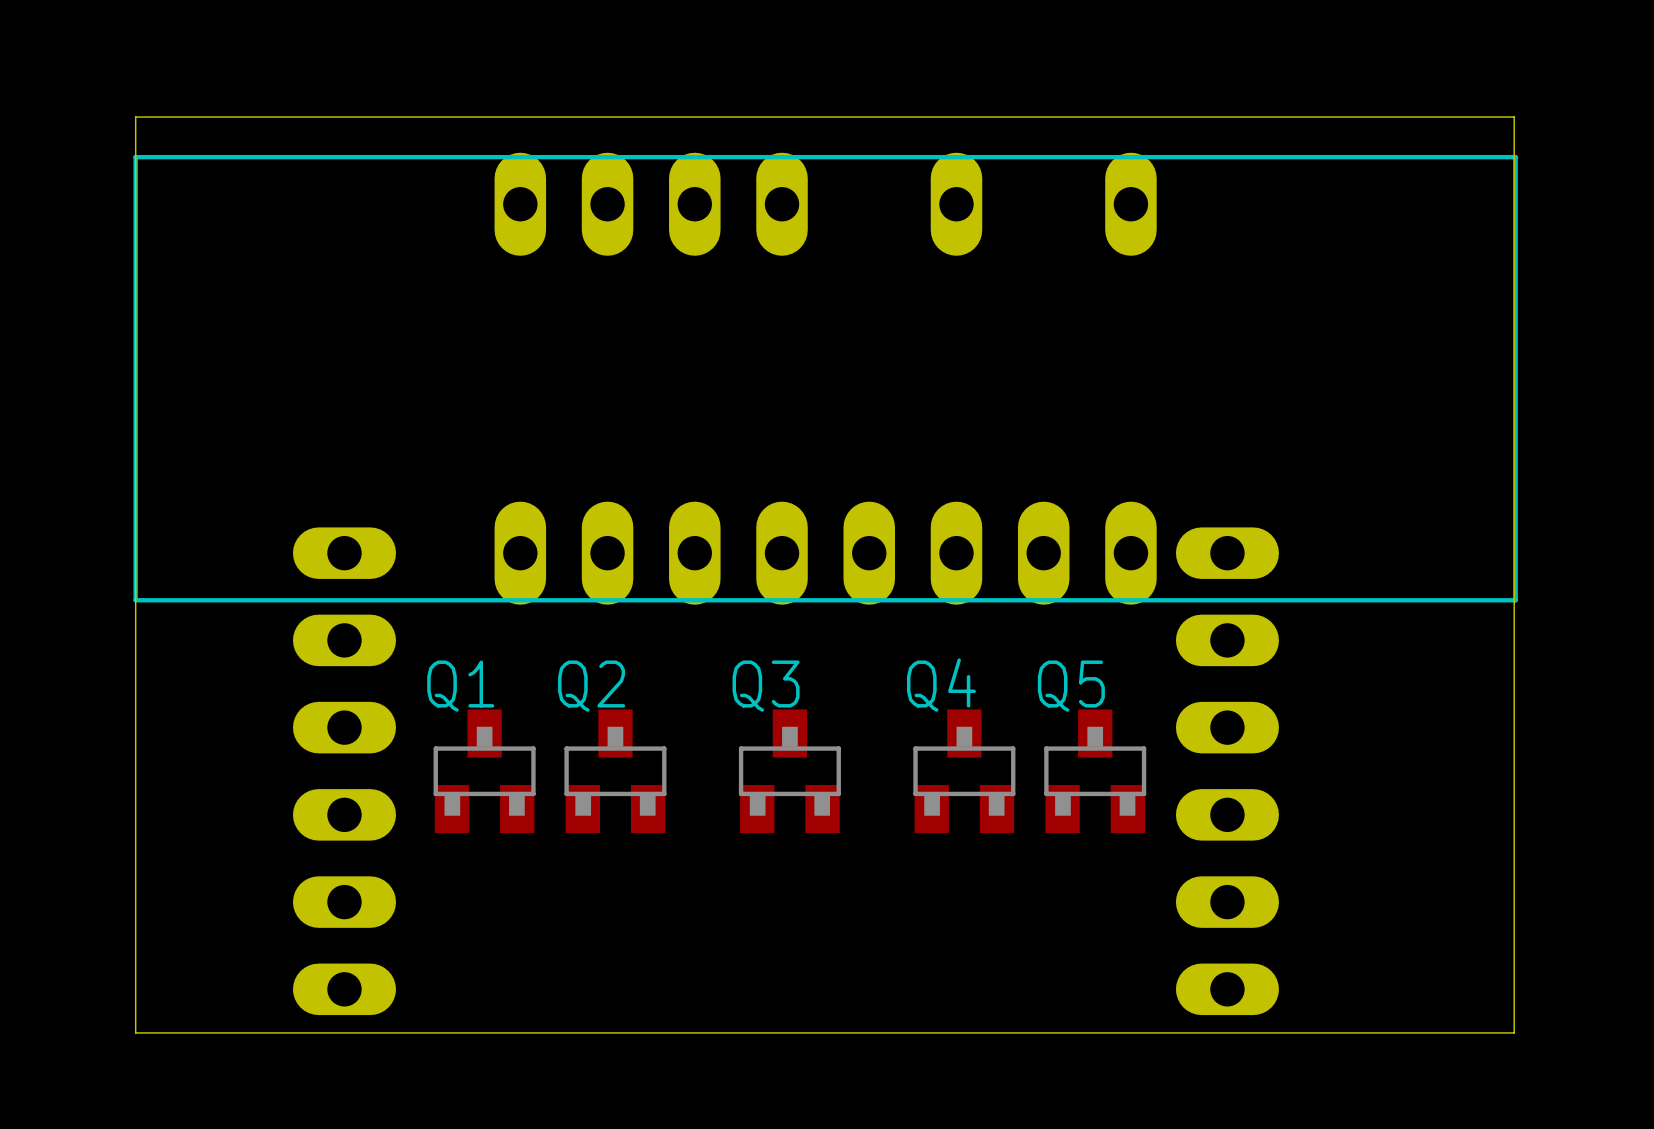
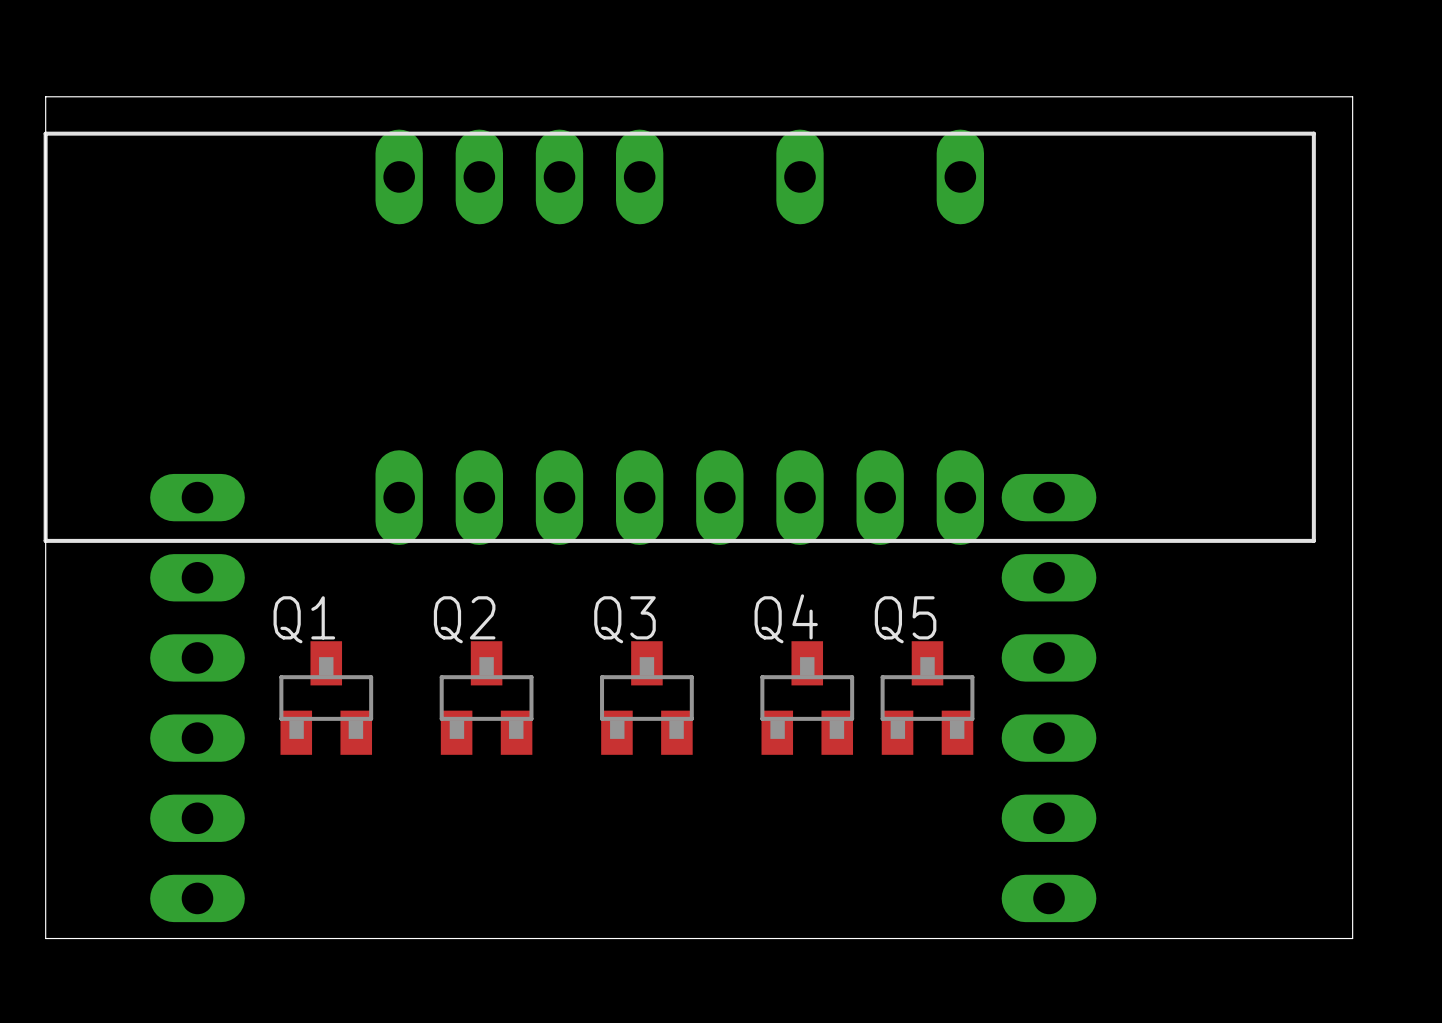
board edge: (1514, 117) (1514, 1032) -> (1312, 96) (1352, 96) (1352, 938) (1312, 938)
part position: (344, 771) -> (197, 698)
Q1 position: (484, 771) -> (326, 698)

